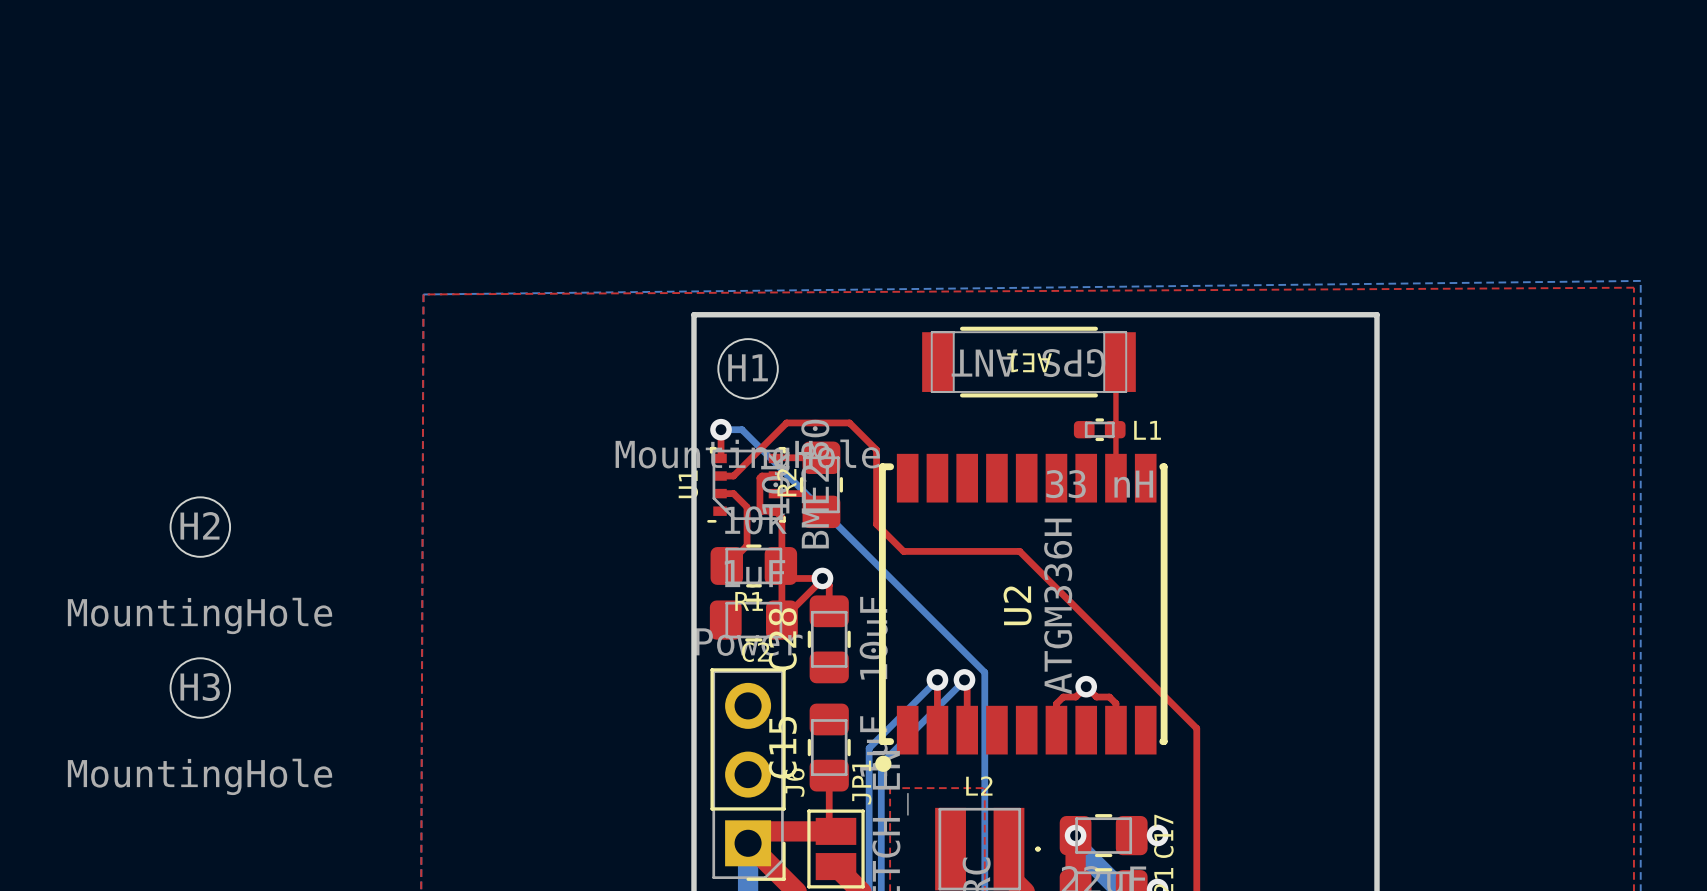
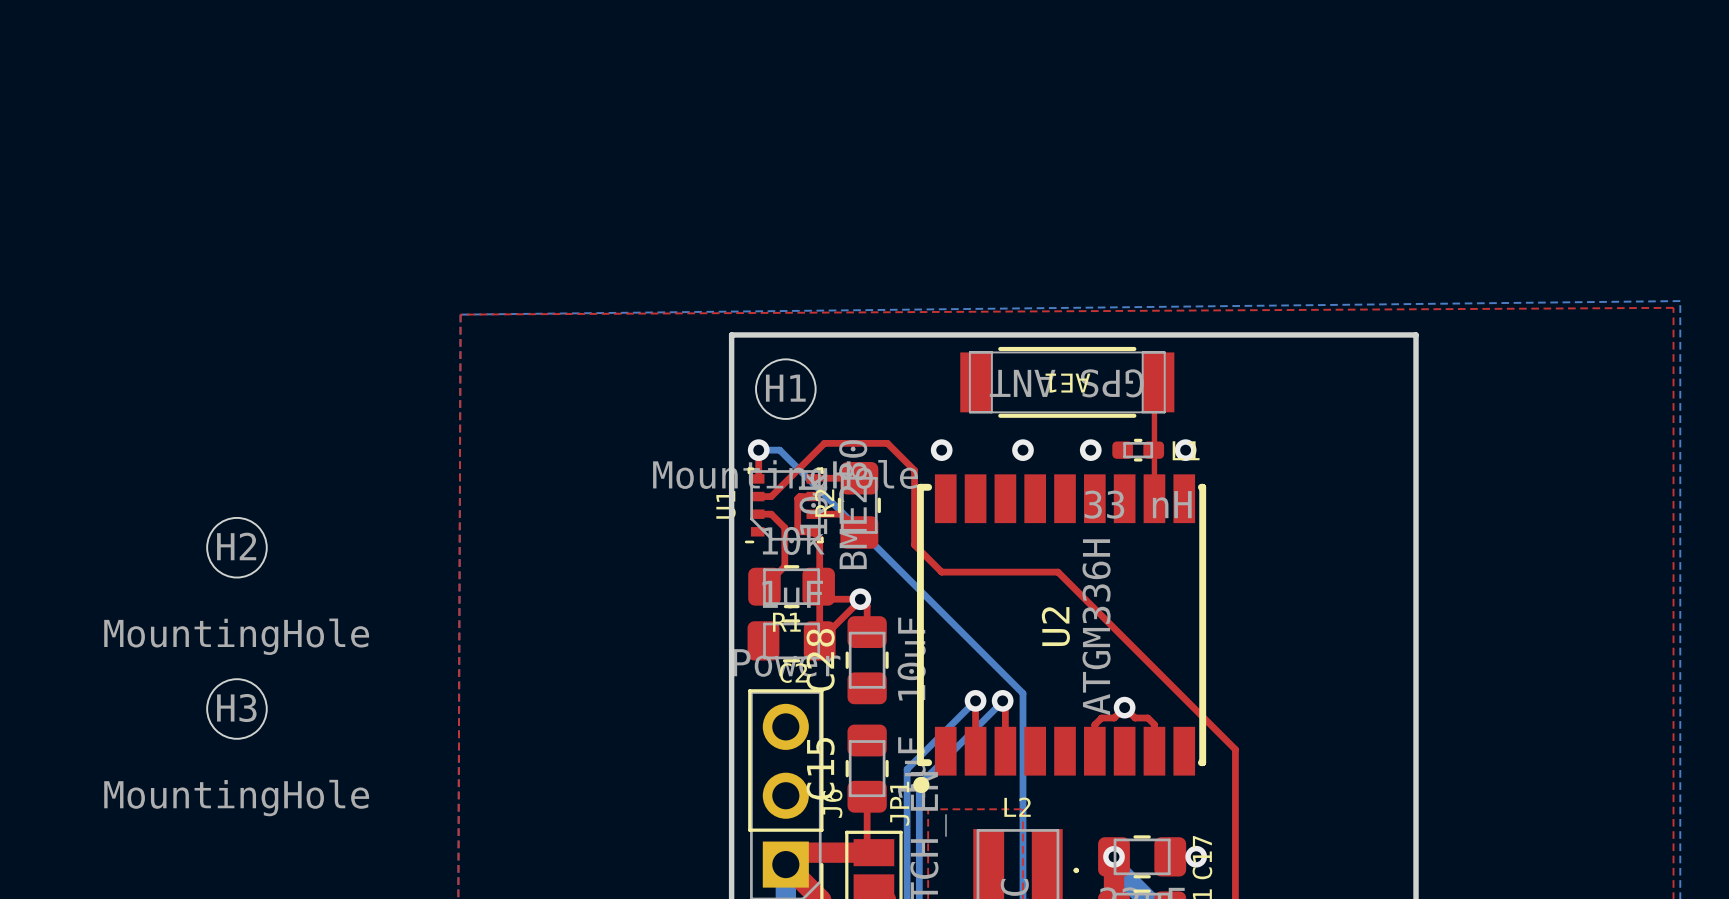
via: none -> (941, 450)
via: none -> (1022, 450)
via: none -> (1090, 450)
via: none -> (1185, 450)

